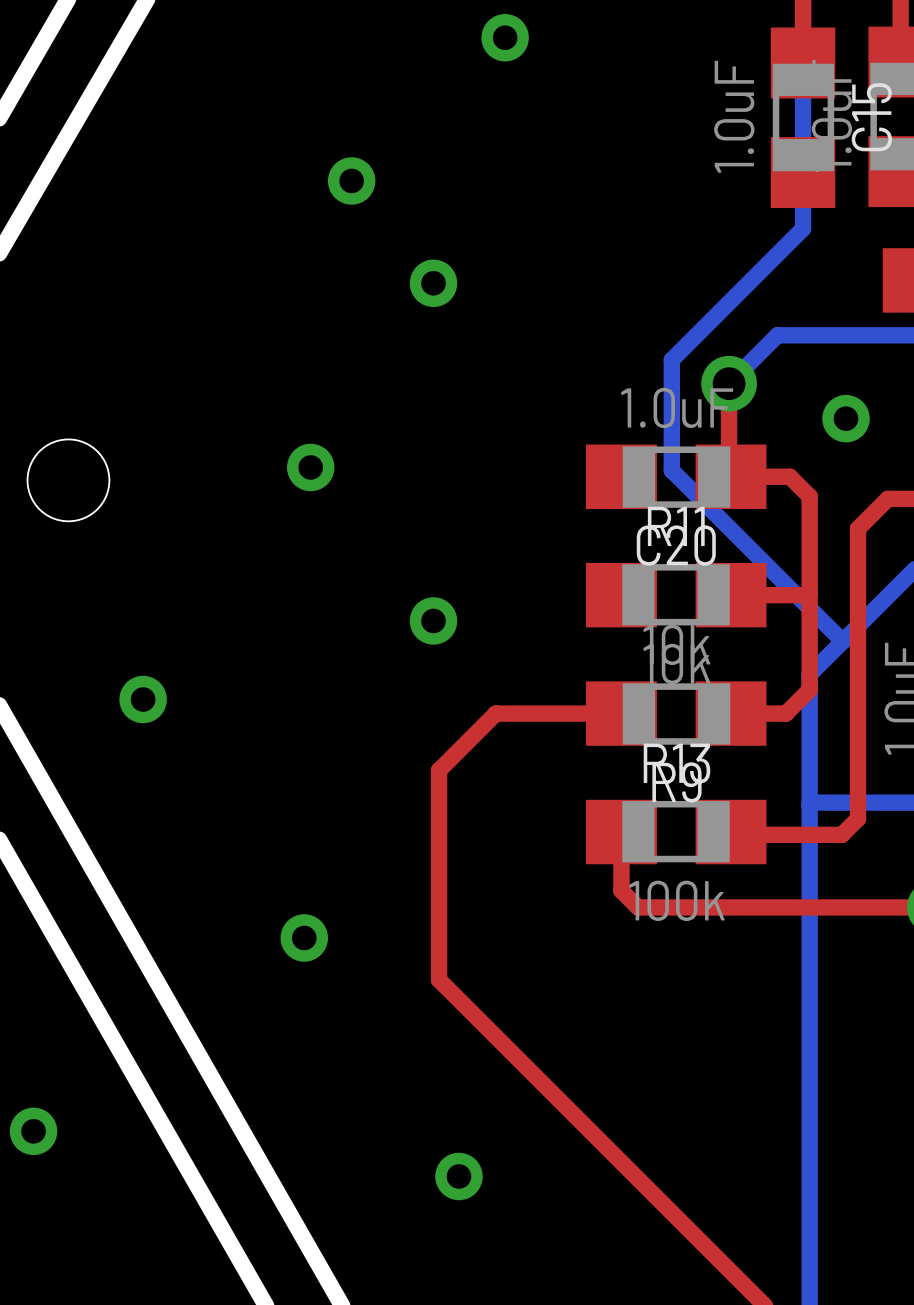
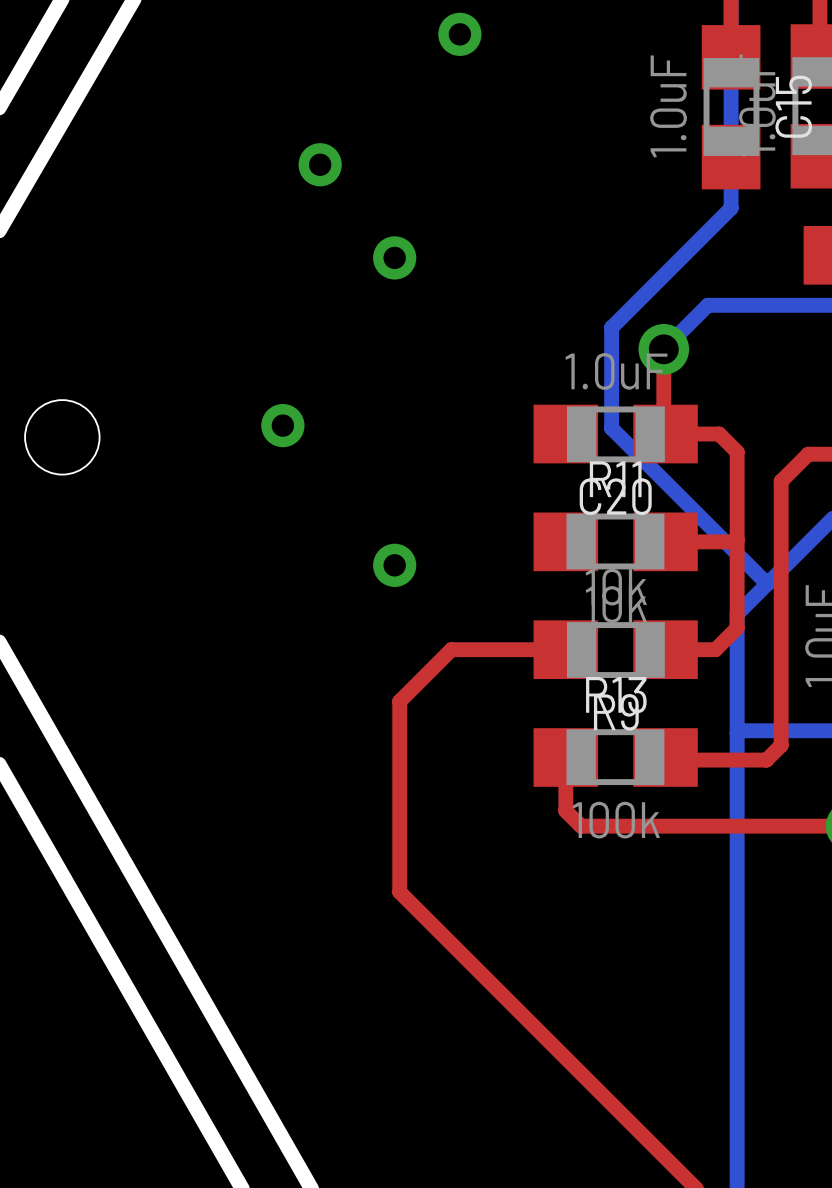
via: (846, 418) -> none
via: (143, 699) -> none
via: (304, 937) -> none
via: (33, 1131) -> none
via: (458, 1176) -> none

